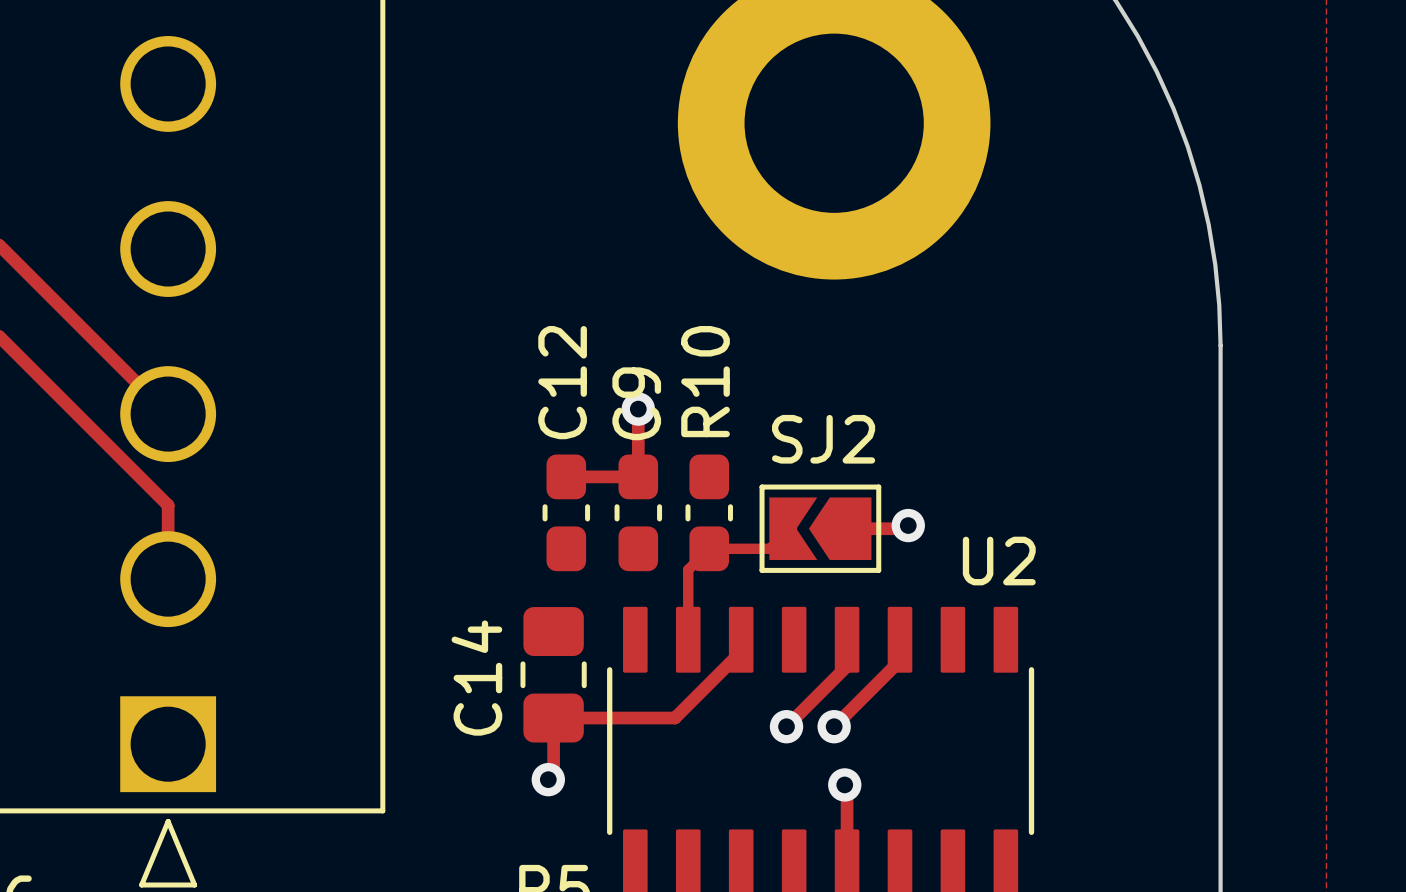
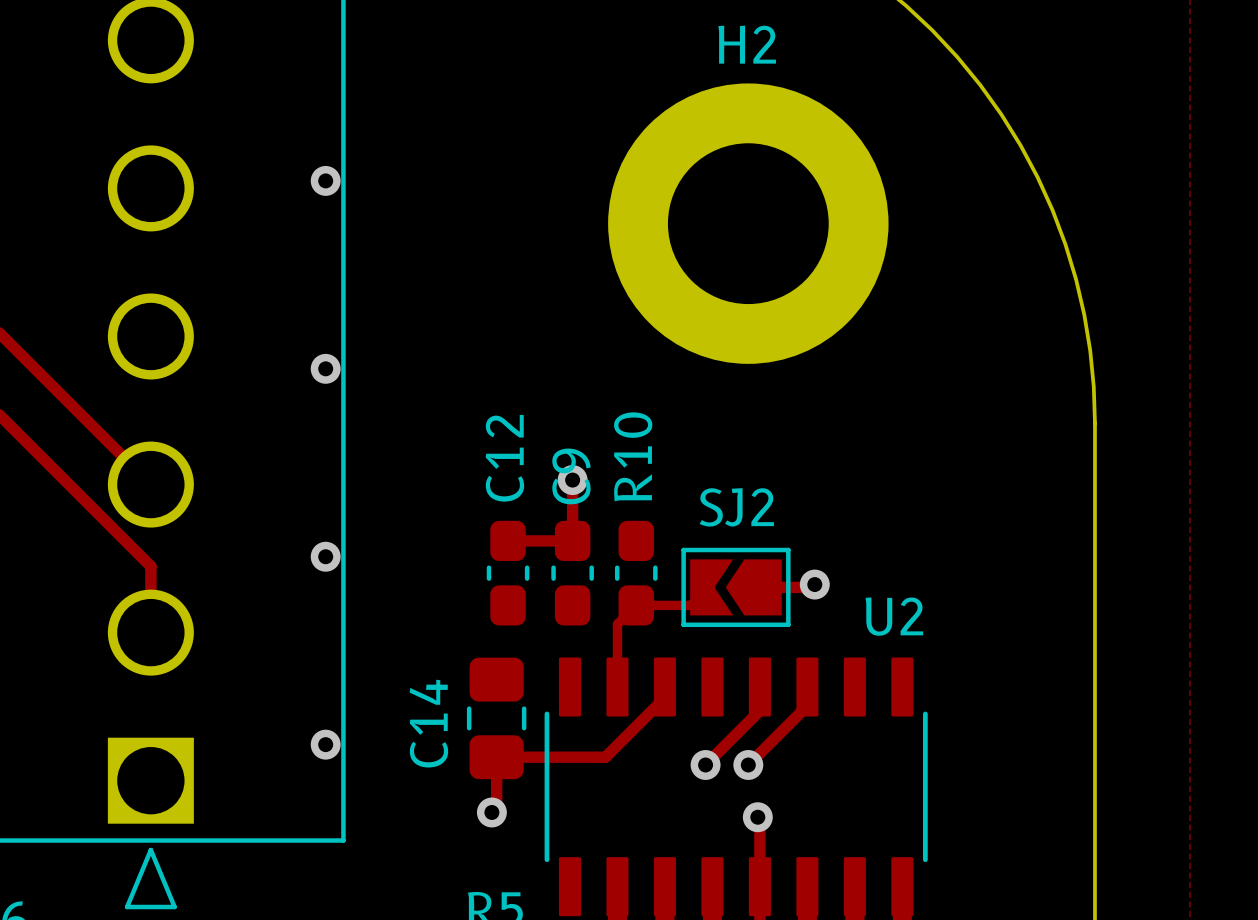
via: none -> (325, 180)
via: none -> (325, 368)
via: none -> (325, 556)
via: none -> (325, 744)

